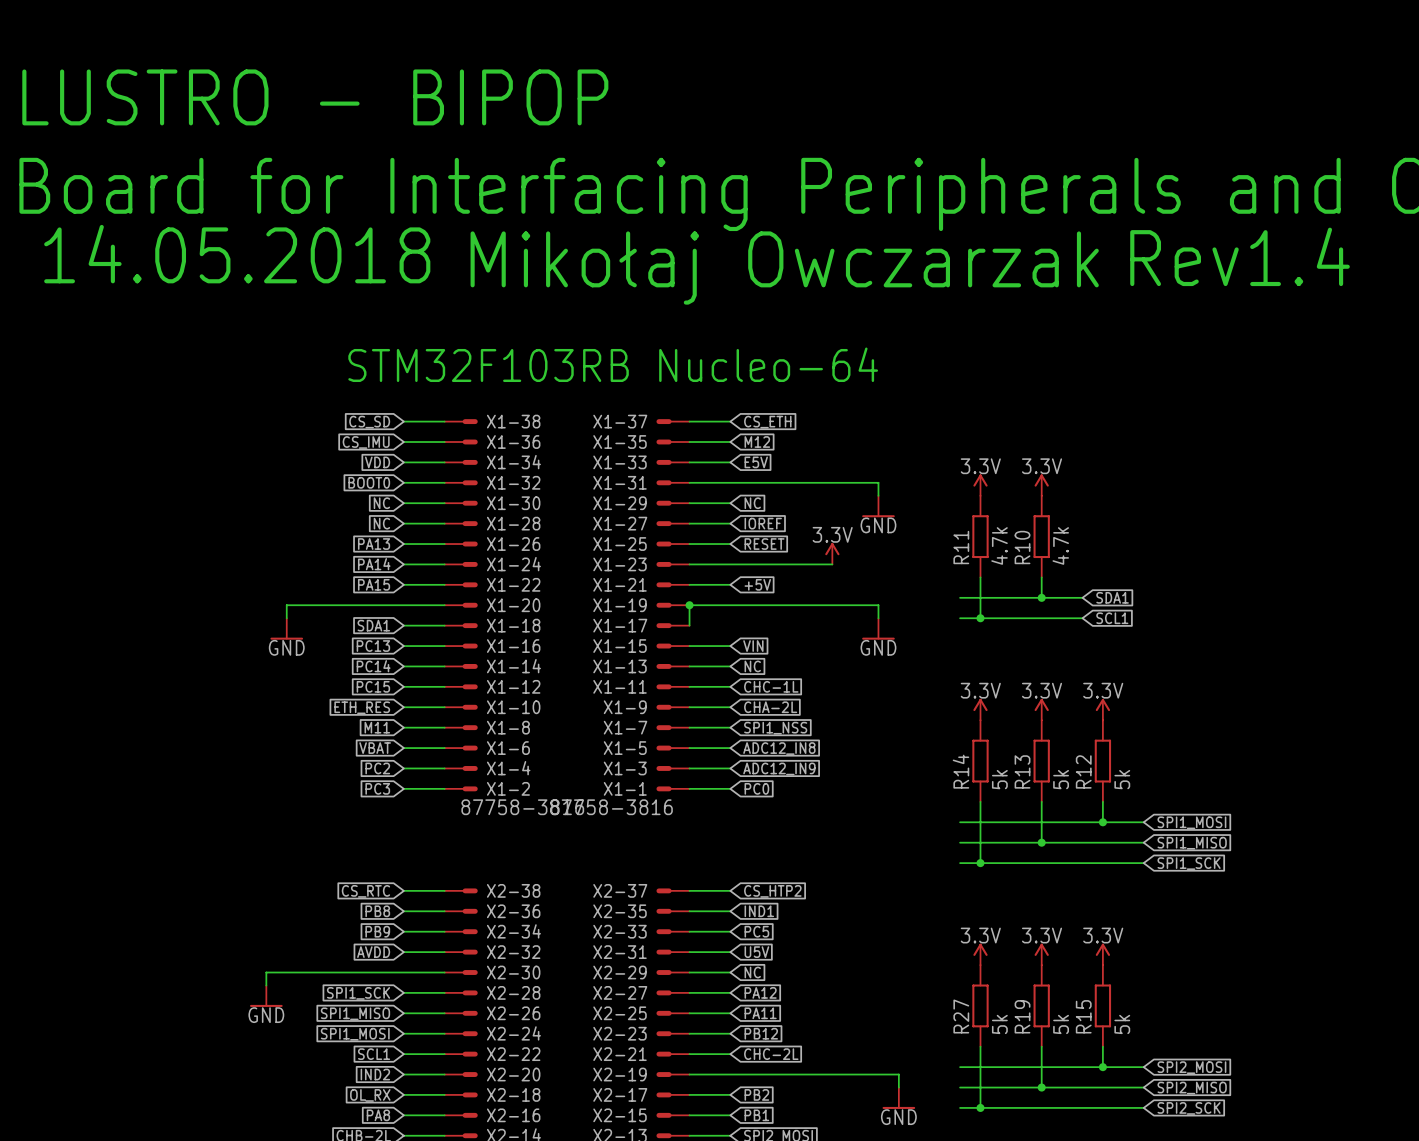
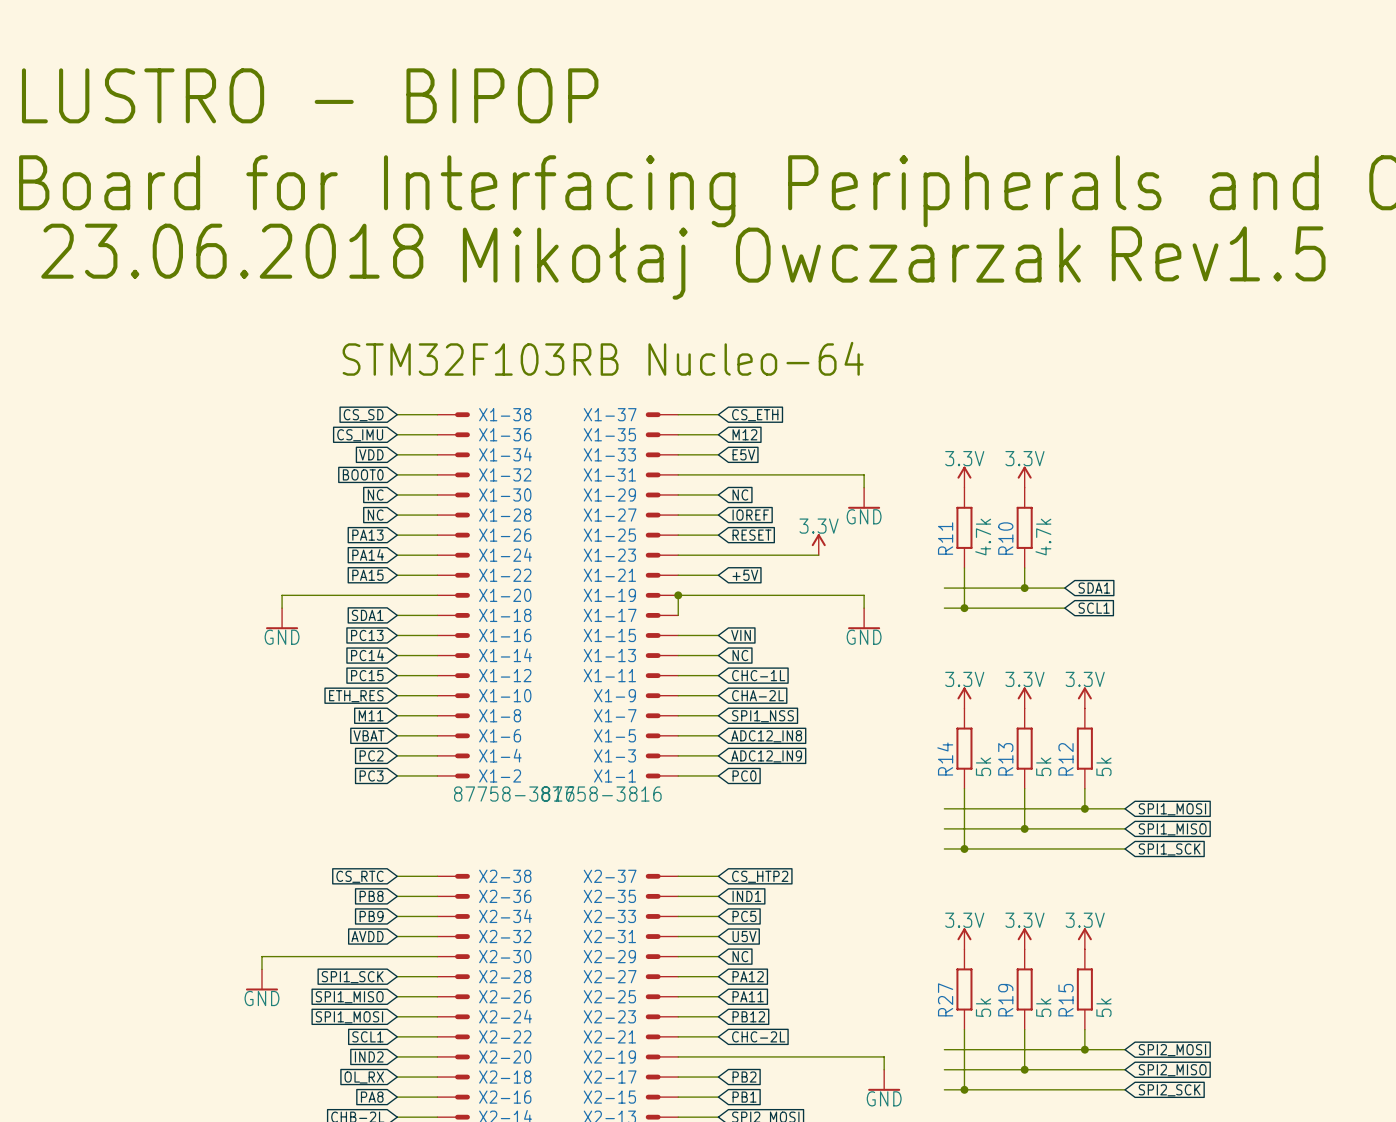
text: 14.05.2018 (237, 254) -> 23.06.2018 (232, 251)
text: Rev1.4 (1240, 256) -> Rev1.5 (1218, 253)

